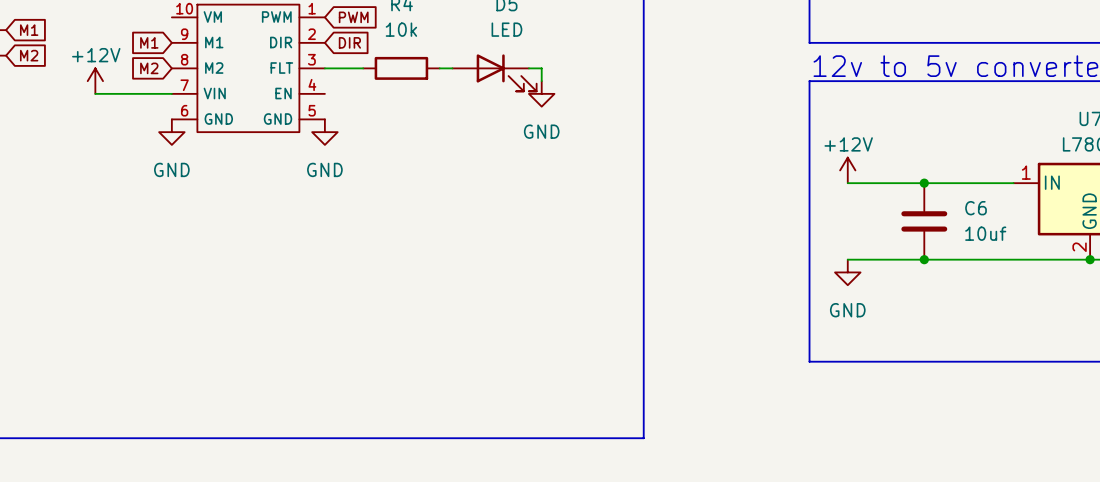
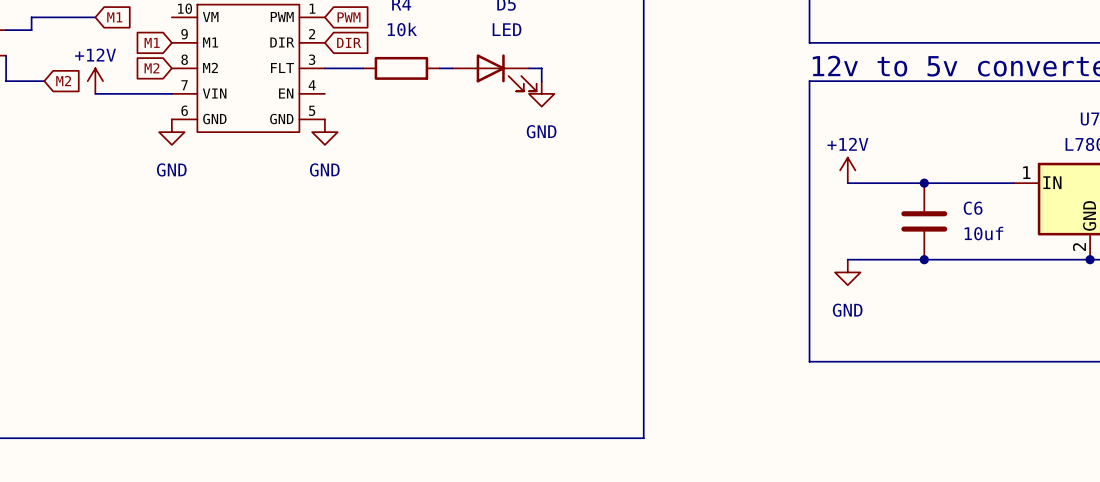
wire: none -> (95, 17) (31, 17) (31, 30) (6, 30)
global label position: M1 (29, 30) -> M1 (114, 17)
wire: none -> (6, 55) (6, 81) (44, 81)
global label position: M2 (29, 55) -> M2 (63, 81)

